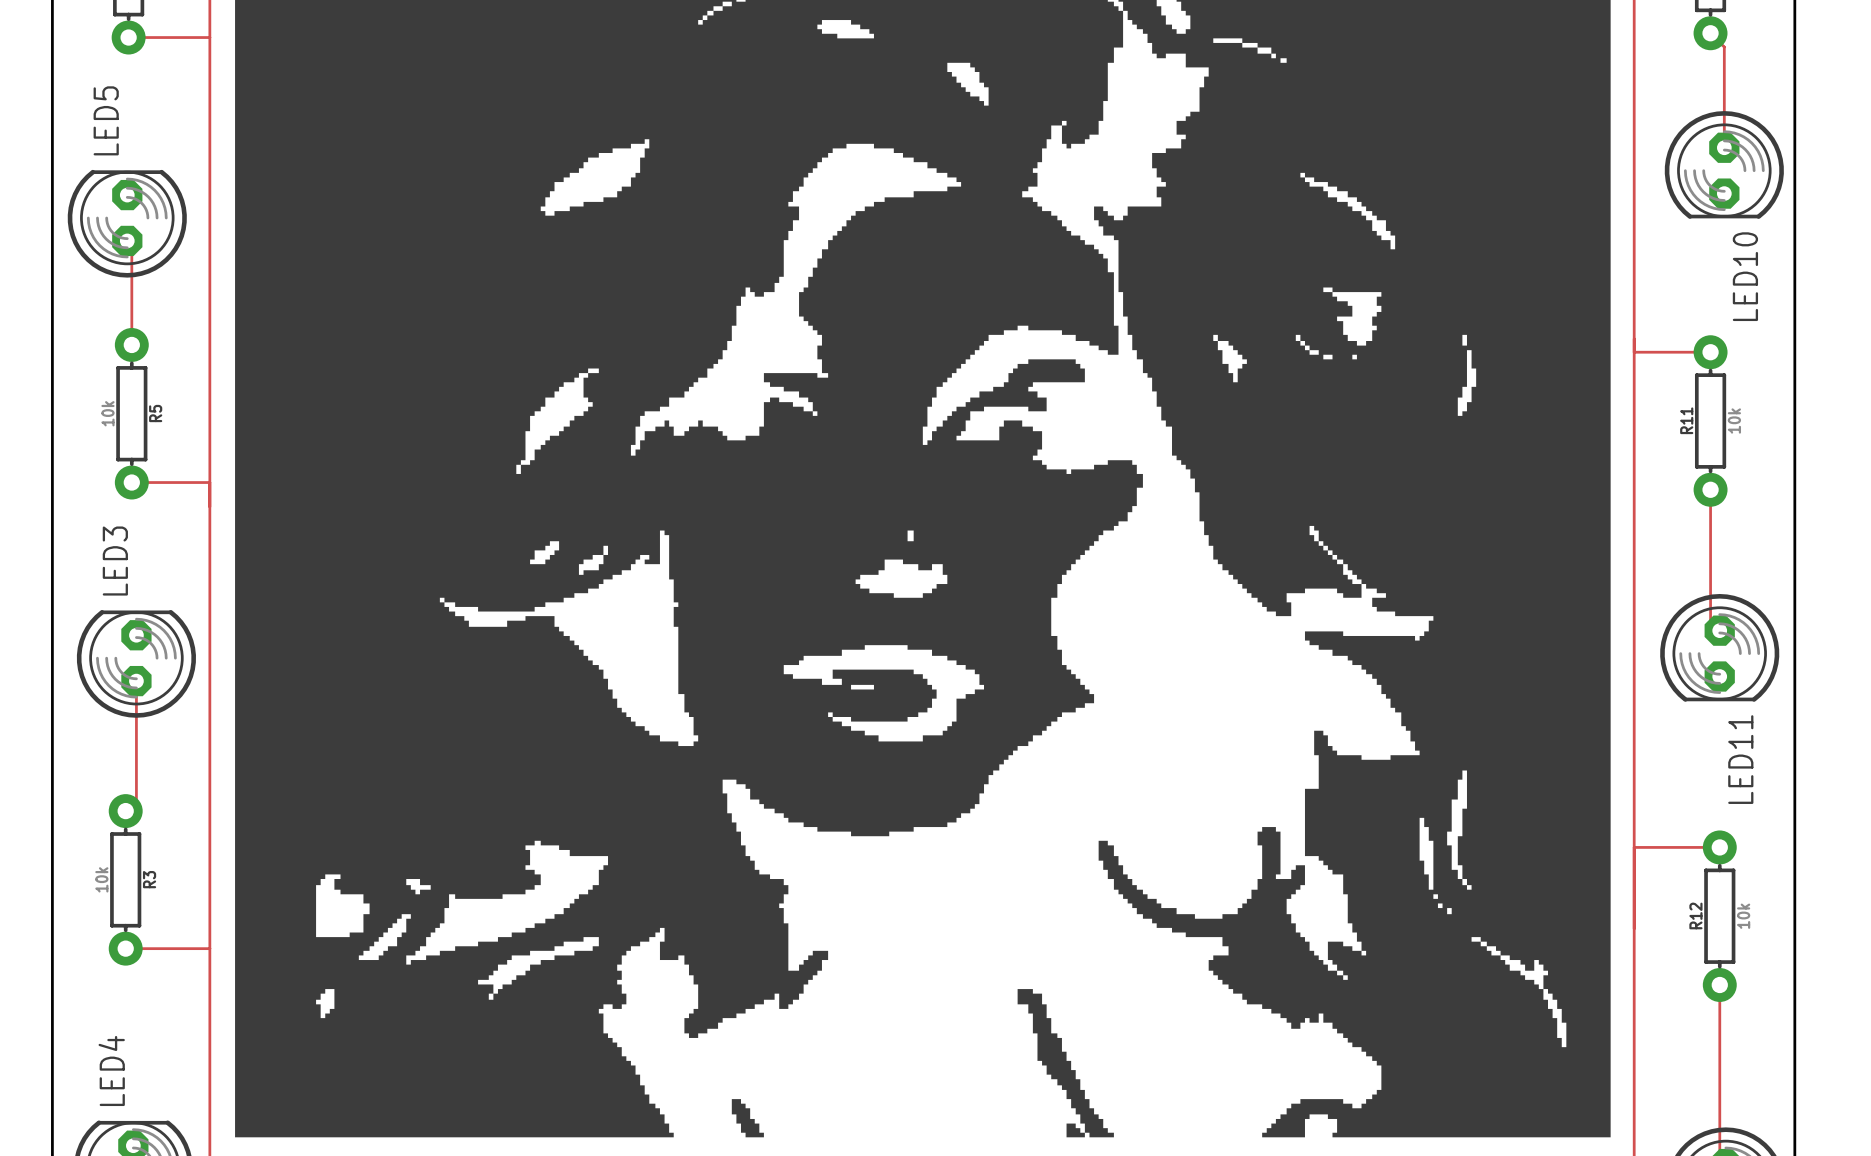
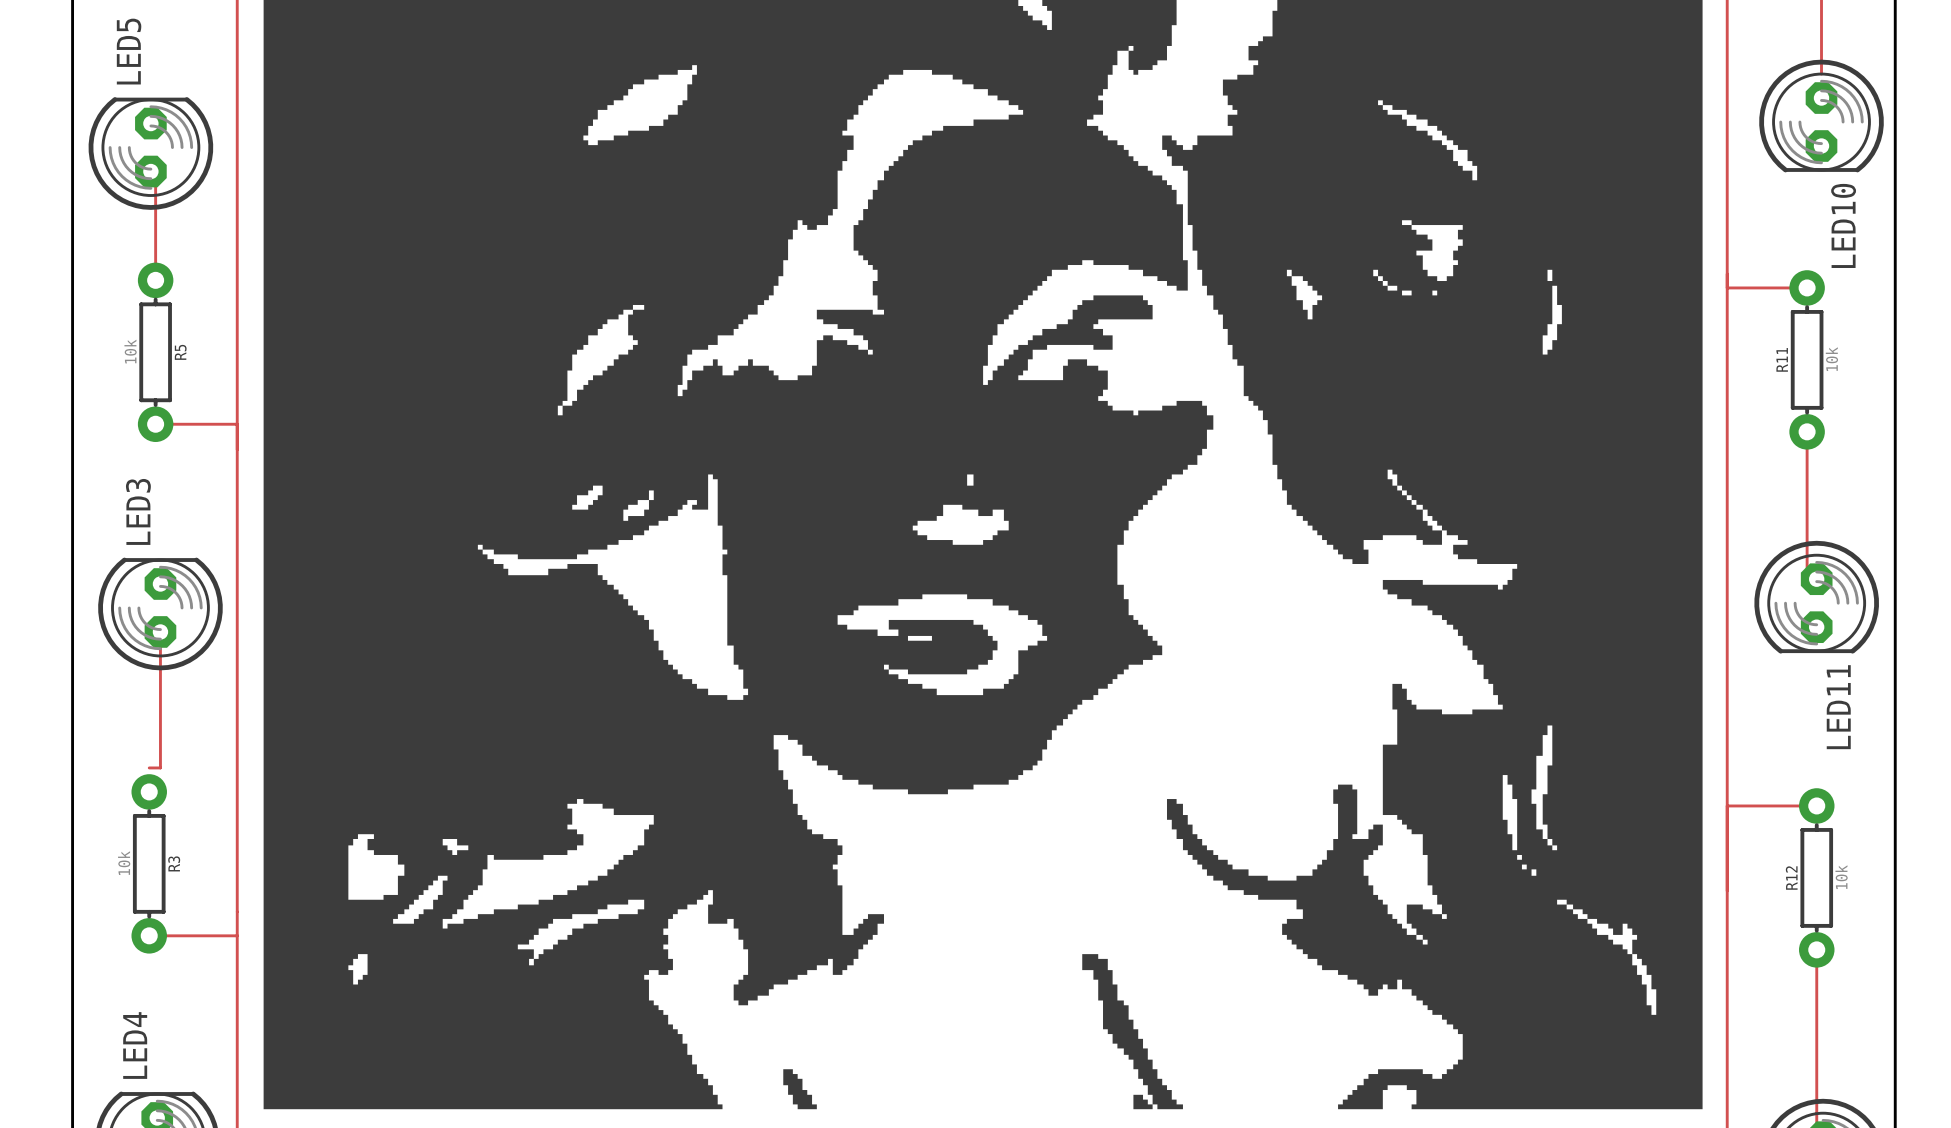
LED10 position: (1724, 164) -> (1821, 116)
R3 position: (125, 879) -> (149, 863)
track: (125, 948) (209, 948) -> (149, 935) (237, 935)

